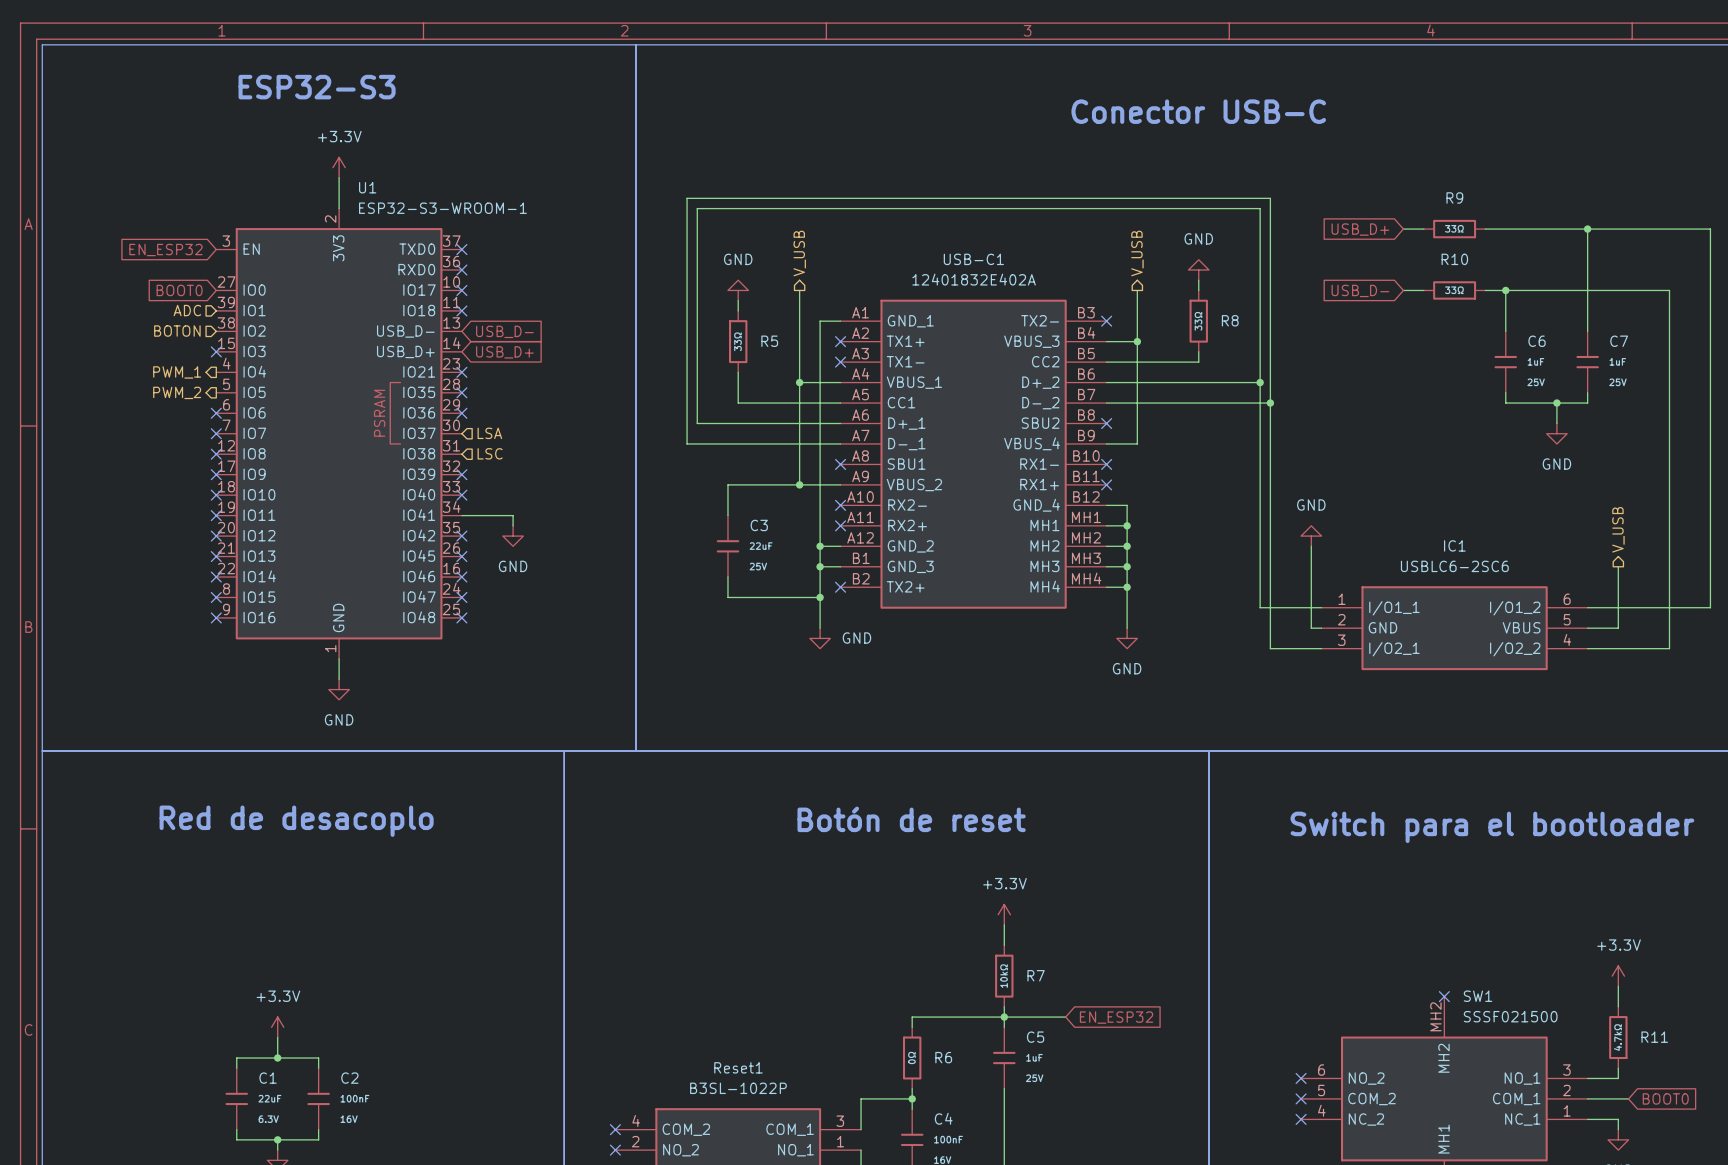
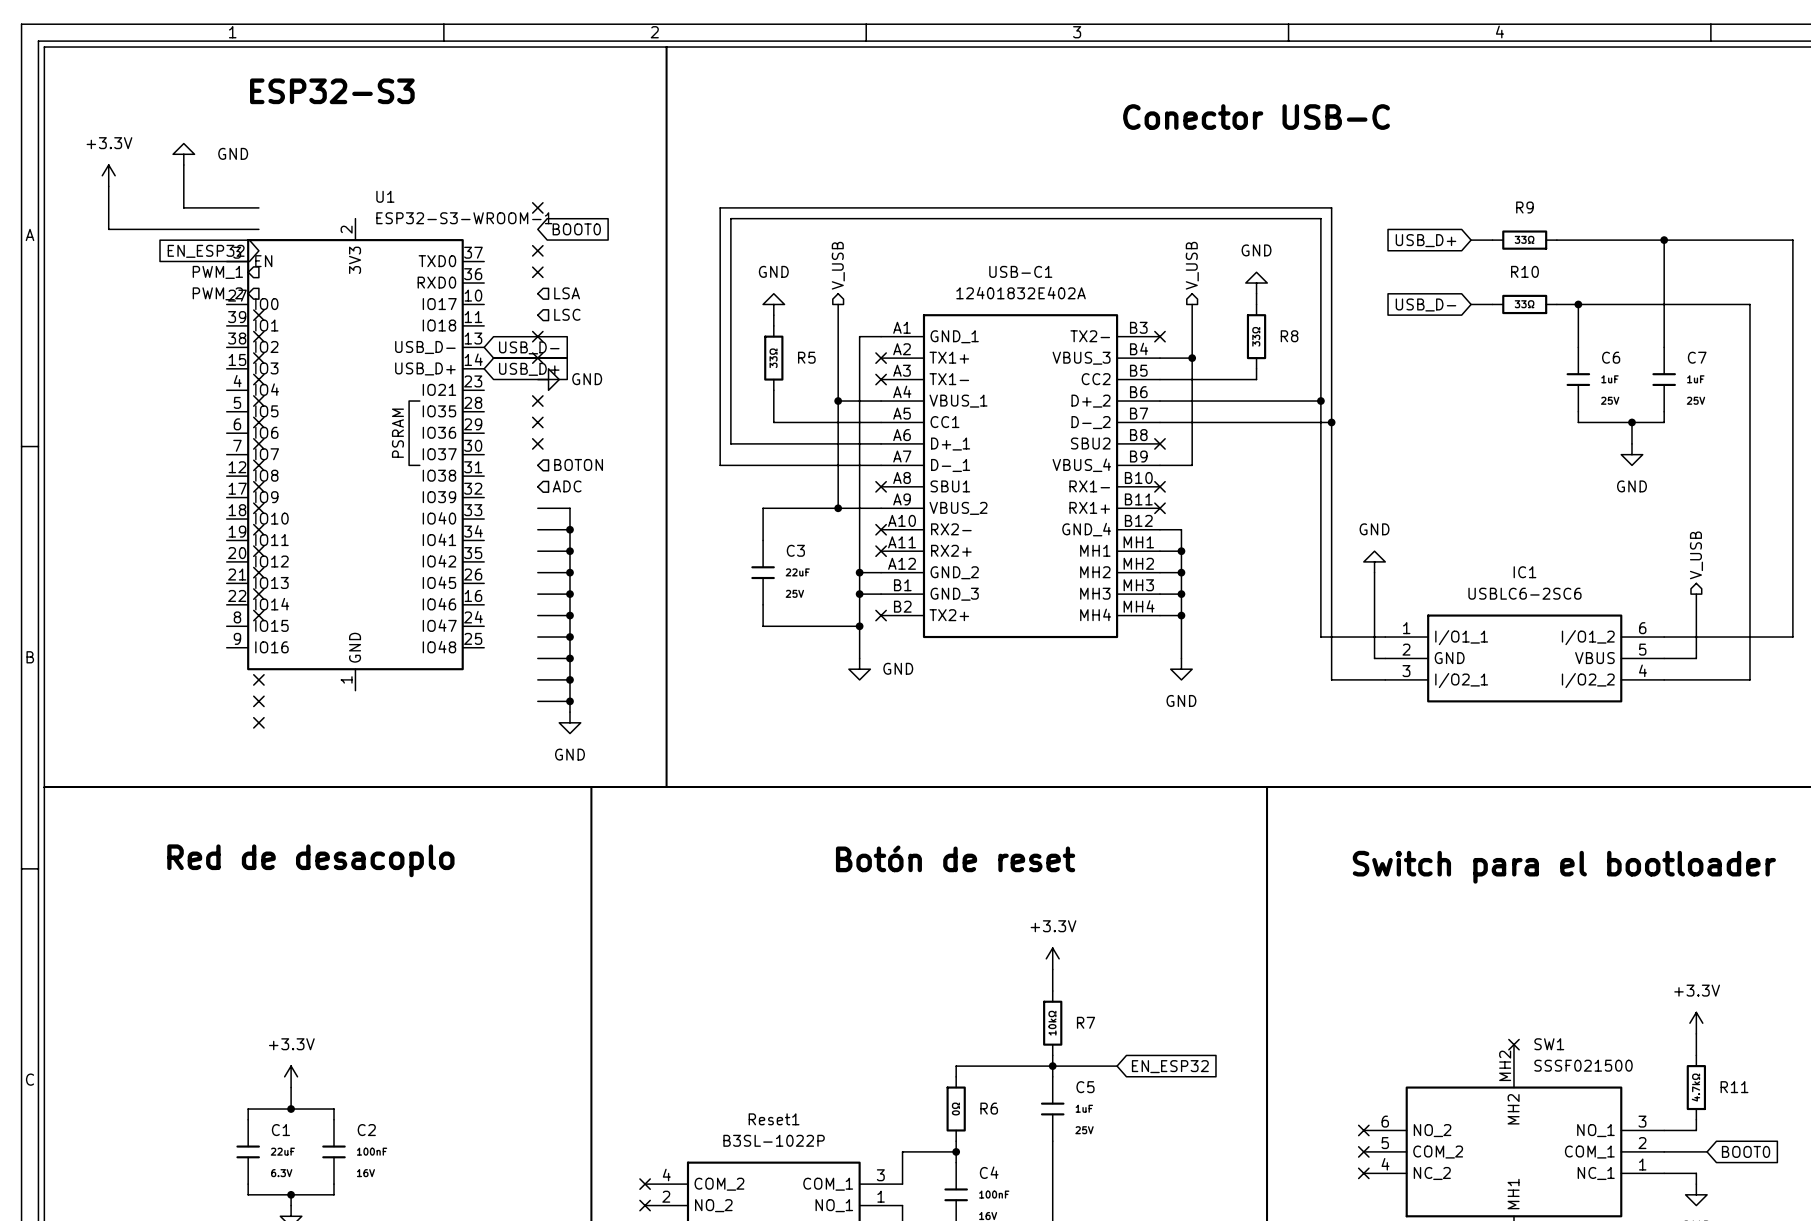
power symbol: none -> GND (183, 154)
wire: none -> (183, 165) (183, 207) (258, 207)
power symbol: none -> +3.3V (108, 175)
power symbol: +3.3V (339, 167) -> none
wire: none -> (108, 186) (108, 229) (258, 229)
wire: (339, 177) (339, 208) -> none
no-connect mark: none -> (537, 207)
global label: none -> BOOT0 (576, 229)
no-connect mark: none -> (537, 250)
no-connect mark: (461, 249) -> none
global label position: EN_ESP32 (165, 250) -> EN_ESP32 (206, 251)
no-connect mark: none -> (537, 272)
no-connect mark: (461, 269) -> none
global label: BOOT0 (179, 290) -> none
no-connect mark: (461, 290) -> none
no-connect mark: none -> (258, 315)
hierarchical label: ADC (187, 310) -> none
no-connect mark: (461, 310) -> none
no-connect mark: none -> (258, 336)
no-connect mark: none -> (537, 336)
hierarchical label: BOTON (177, 331) -> none
no-connect mark: none -> (258, 358)
no-connect mark: none -> (537, 358)
no-connect mark: (216, 351) -> none
no-connect mark: none -> (258, 379)
power symbol: none -> GND (548, 379)
hierarchical label position: PWM_1 (177, 372) -> PWM_1 (217, 272)
no-connect mark: (461, 372) -> none
no-connect mark: none -> (258, 401)
no-connect mark: none -> (537, 401)
hierarchical label position: PWM_2 (177, 392) -> PWM_2 (217, 293)
no-connect mark: (461, 392) -> none
no-connect mark: none -> (258, 422)
no-connect mark: none -> (537, 422)
no-connect mark: (216, 413) -> none
no-connect mark: (461, 413) -> none
no-connect mark: none -> (258, 443)
no-connect mark: none -> (537, 443)
no-connect mark: (216, 433) -> none
hierarchical label position: LSA (489, 433) -> LSA (567, 293)
no-connect mark: none -> (258, 465)
hierarchical label: none -> BOTON (578, 464)
hierarchical label position: LSC (490, 453) -> LSC (567, 314)
no-connect mark: (216, 454) -> none
no-connect mark: none -> (258, 486)
hierarchical label: none -> ADC (567, 486)
no-connect mark: (216, 474) -> none
no-connect mark: (461, 474) -> none
no-connect mark: none -> (258, 508)
wire: none -> (537, 508) (569, 508) (569, 712)
no-connect mark: (216, 495) -> none
no-connect mark: (461, 495) -> none
no-connect mark: none -> (258, 529)
wire: none -> (537, 529) (569, 529)
junction: none -> (569, 529)
no-connect mark: (216, 515) -> none
wire: (461, 515) (513, 515) (513, 525) -> (569, 551) (537, 551)
no-connect mark: none -> (258, 551)
junction: none -> (569, 551)
no-connect mark: (216, 536) -> none
no-connect mark: (461, 536) -> none
power symbol: GND (513, 536) -> none
no-connect mark: none -> (258, 572)
wire: none -> (537, 572) (569, 572)
junction: none -> (569, 572)
no-connect mark: (216, 556) -> none
no-connect mark: (461, 556) -> none
no-connect mark: none -> (258, 594)
wire: none -> (537, 594) (569, 594)
junction: none -> (569, 594)
no-connect mark: (216, 577) -> none
no-connect mark: (461, 577) -> none
no-connect mark: none -> (258, 615)
wire: none -> (537, 615) (569, 615)
junction: none -> (569, 615)
no-connect mark: (216, 597) -> none
no-connect mark: (461, 597) -> none
wire: none -> (537, 637) (569, 637)
junction: none -> (569, 637)
no-connect mark: (216, 617) -> none
no-connect mark: (461, 617) -> none
wire: none -> (537, 658) (569, 658)
junction: none -> (569, 658)
no-connect mark: none -> (258, 679)
wire: none -> (537, 679) (569, 679)
junction: none -> (569, 679)
wire: (339, 658) (339, 679) -> none
no-connect mark: none -> (258, 701)
wire: none -> (537, 701) (569, 701)
junction: none -> (569, 701)
no-connect mark: none -> (258, 722)
power symbol: GND (339, 689) -> none
power symbol: none -> GND (569, 722)

